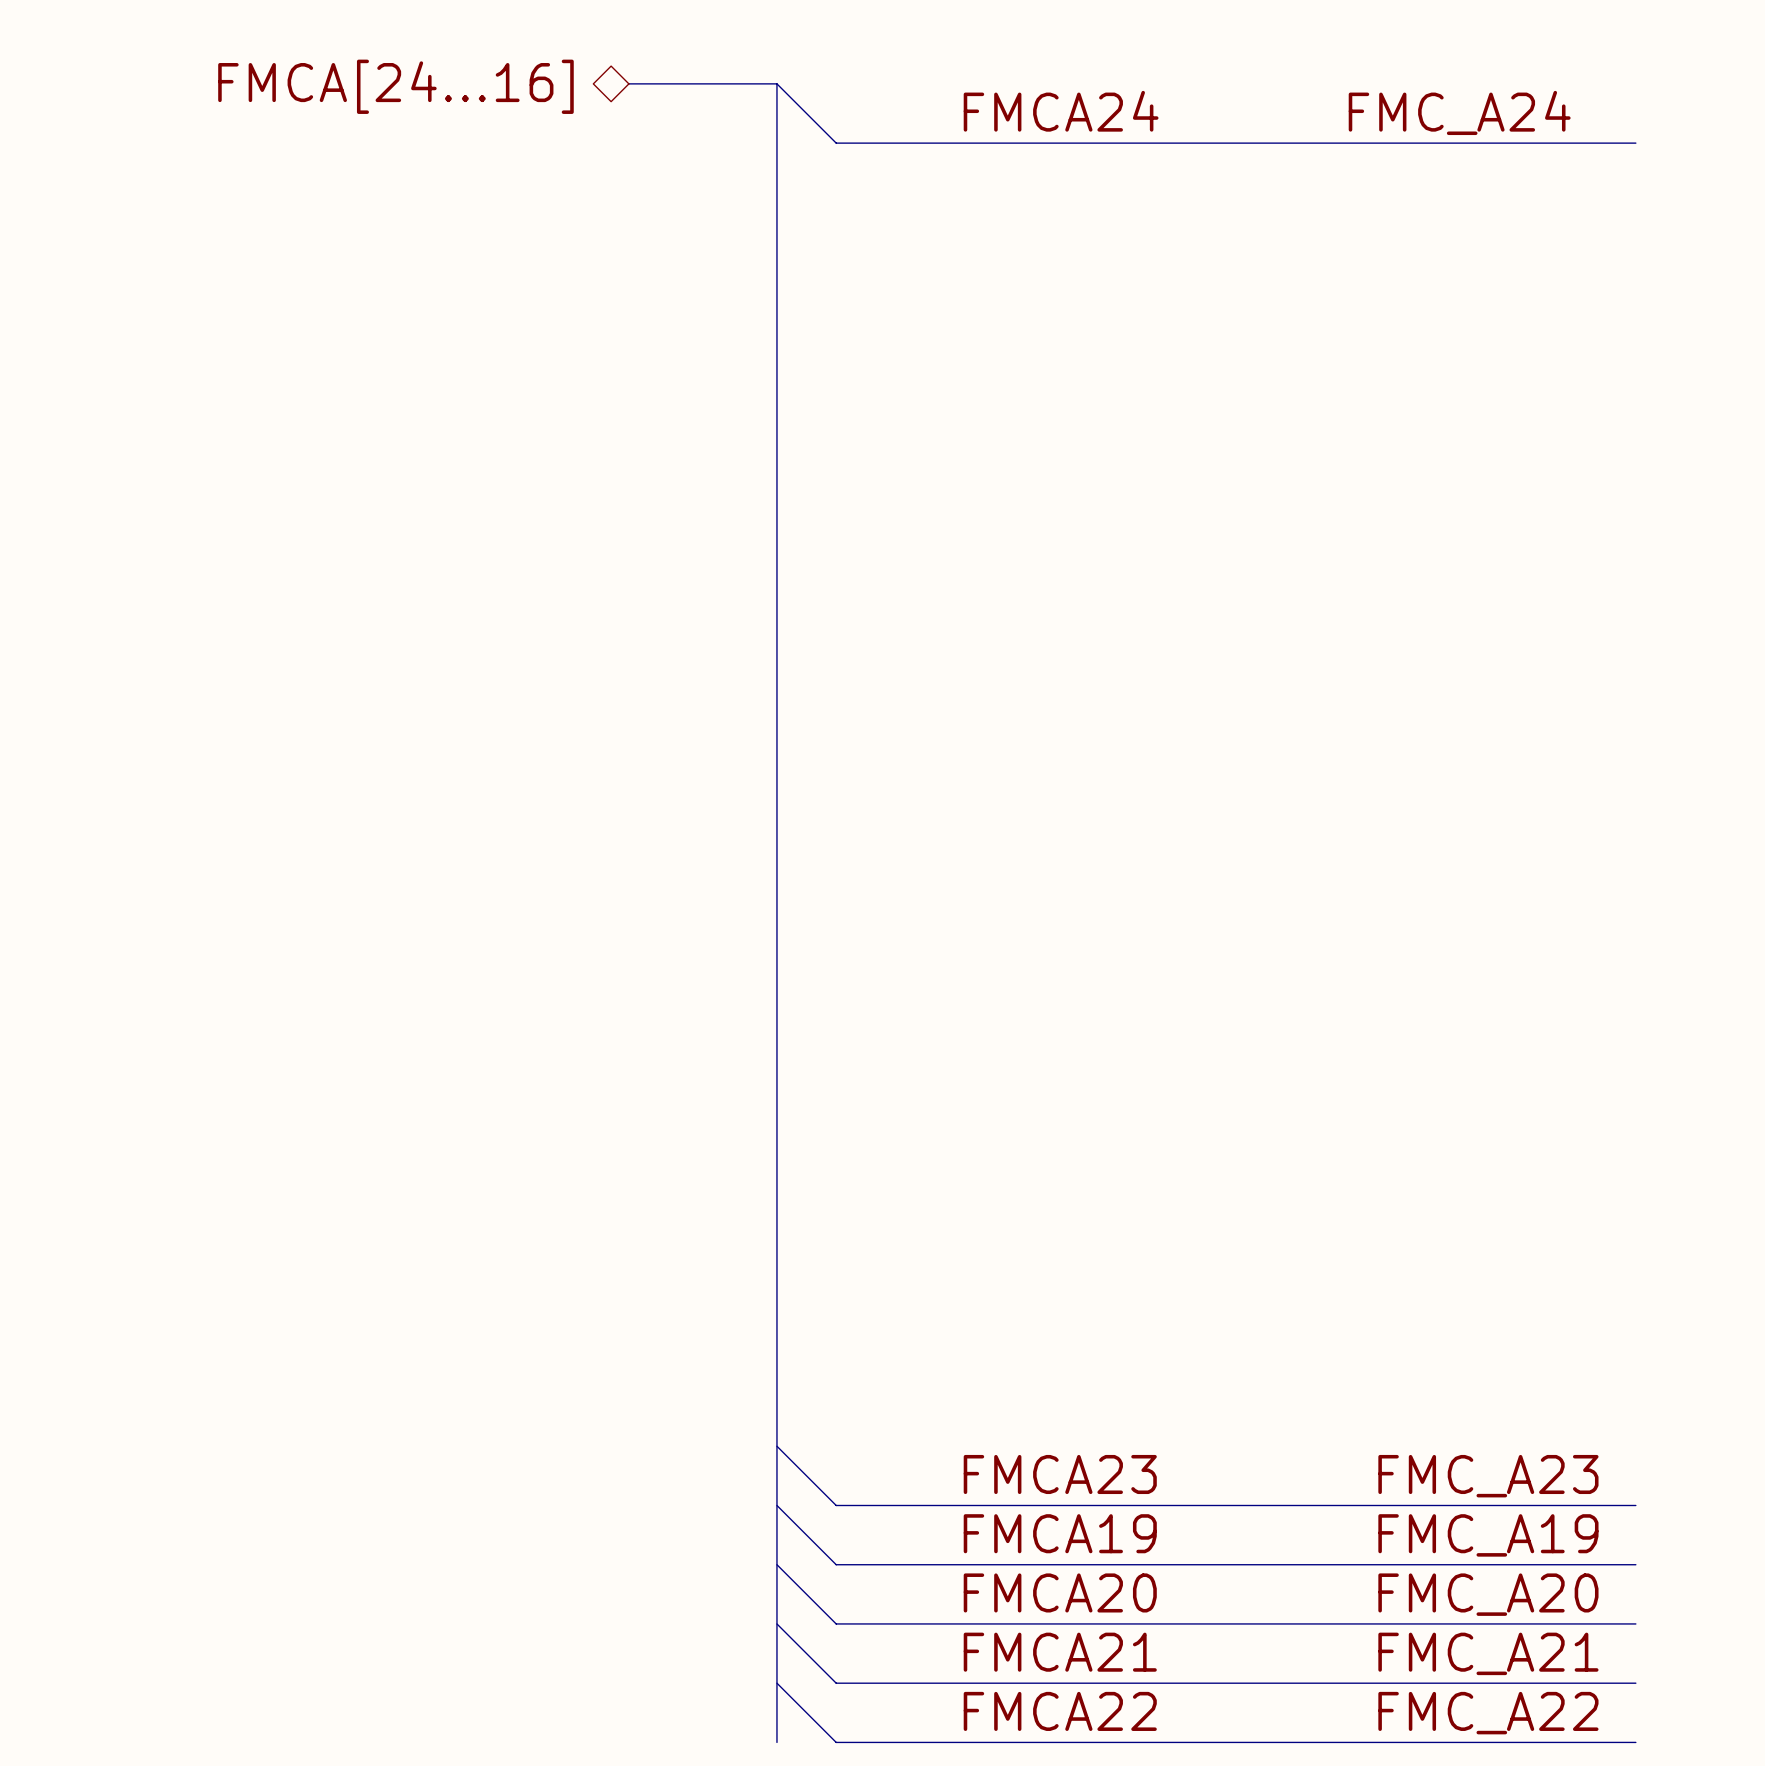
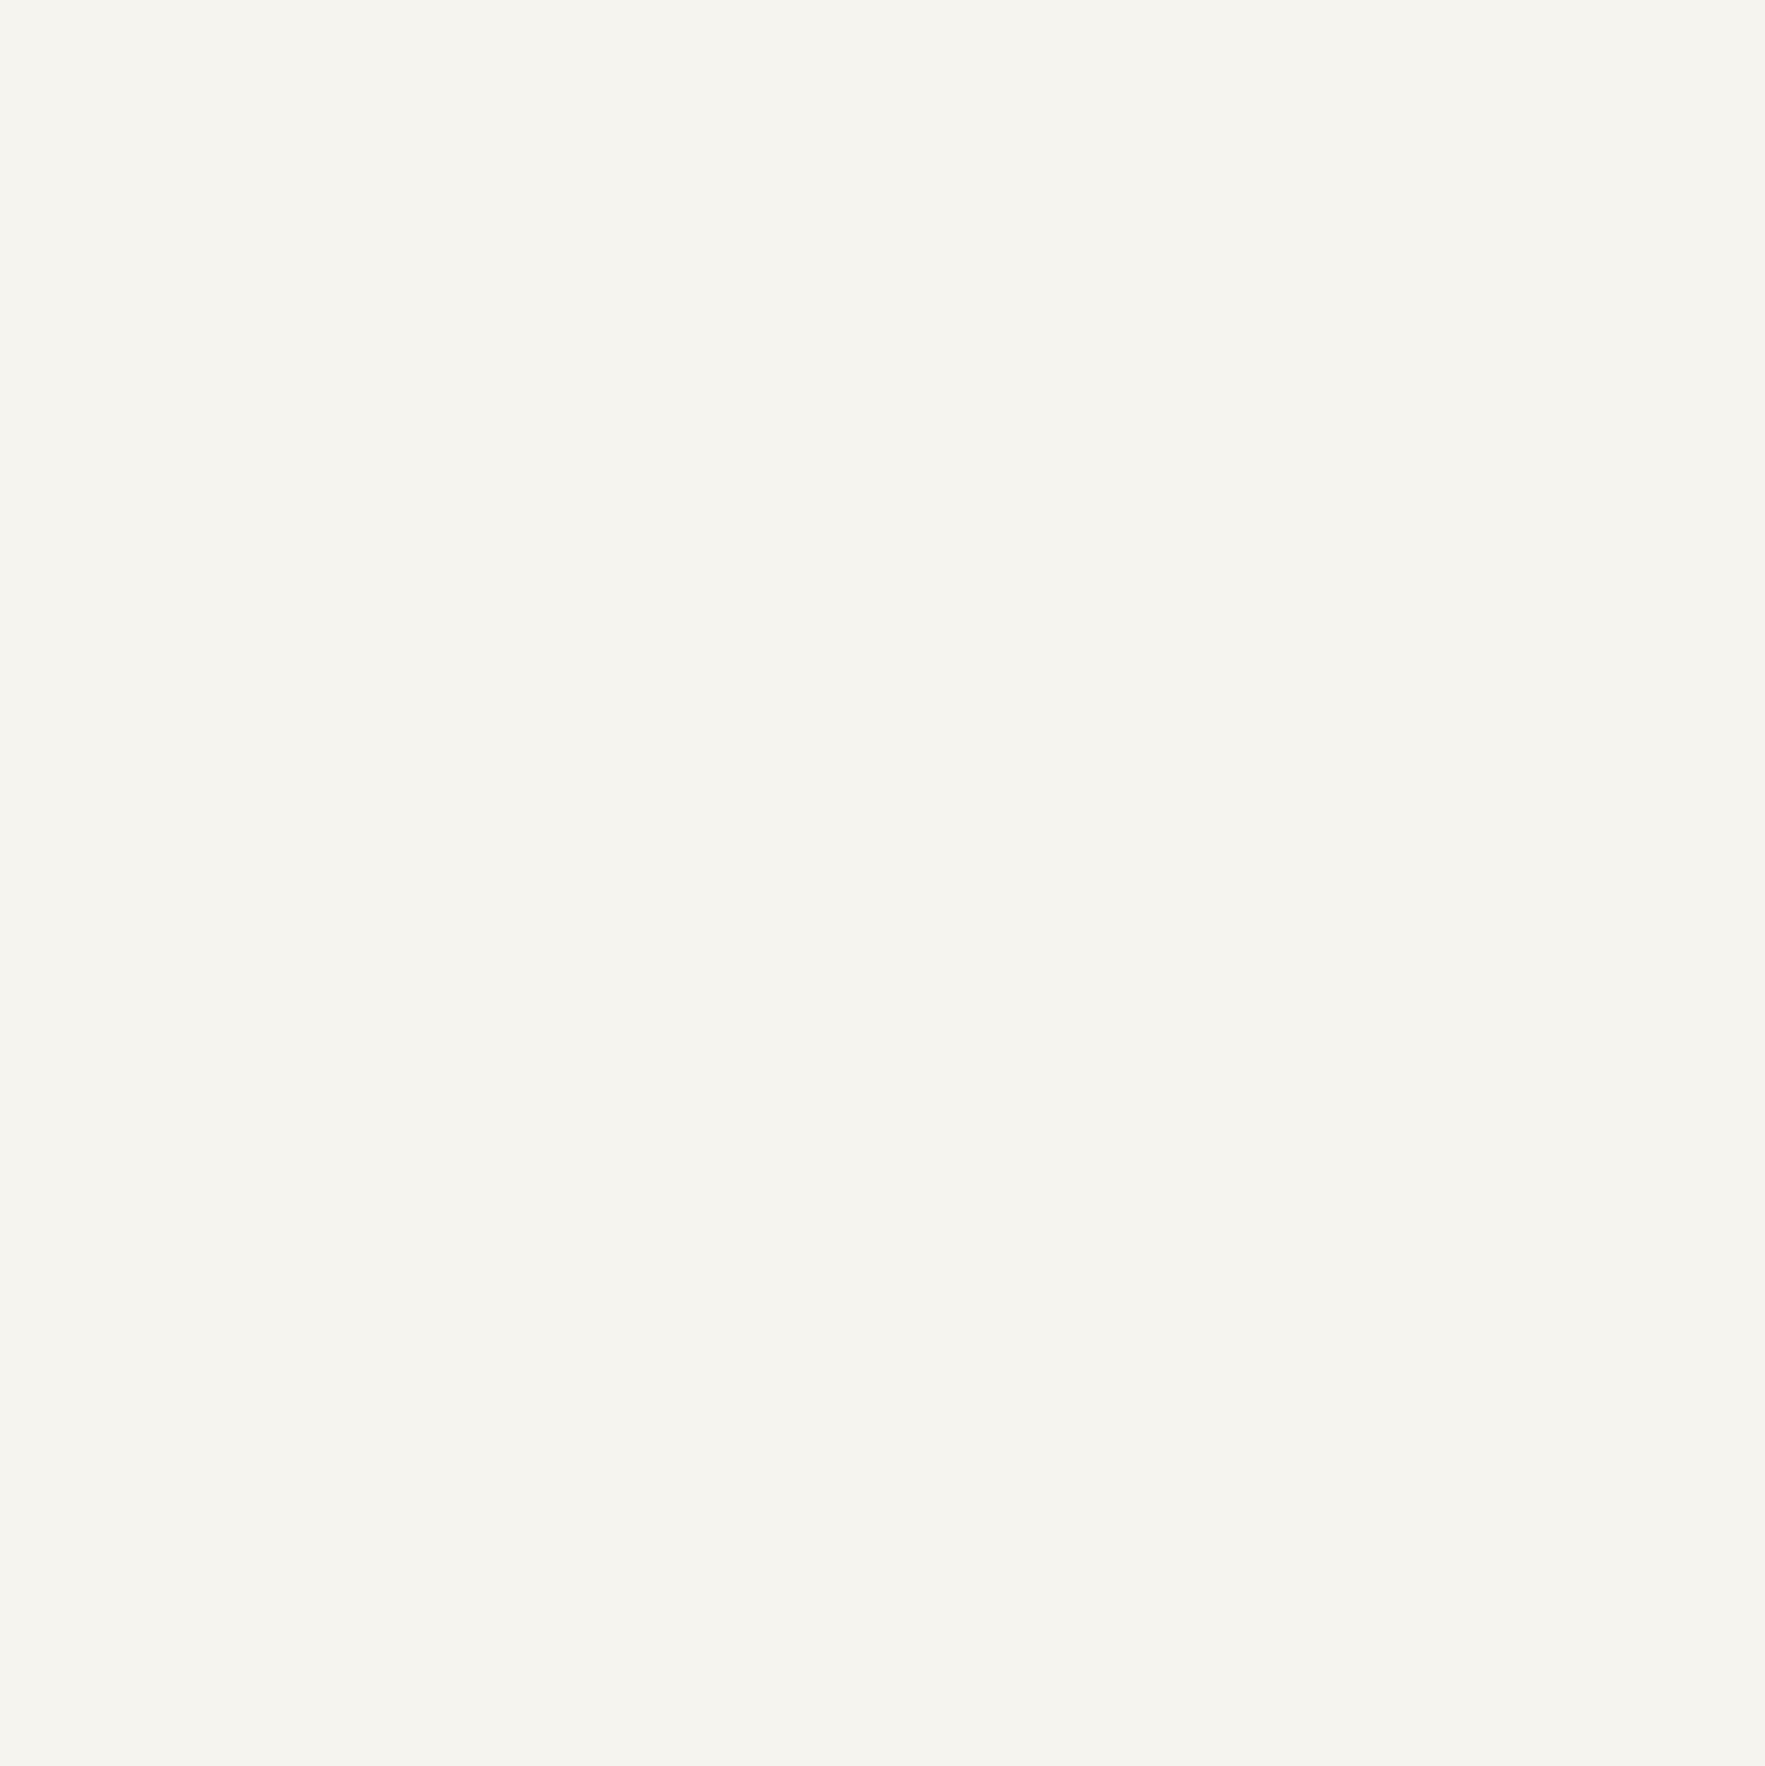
bus: (628, 83) (776, 83) (776, 1742) -> none
wire: (776, 83) (836, 143) (1635, 143) -> none
hierarchical label: FMCA[24...16] (395, 86) -> none
label: FMCA24 (1061, 111) -> none
label: FMC_A24 (1459, 112) -> none
wire: (776, 1446) (836, 1505) (1635, 1505) -> none
label: FMCA23 (1060, 1474) -> none
label: FMC_A23 (1488, 1476) -> none
wire: (776, 1505) (836, 1564) (1635, 1564) -> none
label: FMCA19 (1060, 1533) -> none
label: FMC_A19 (1488, 1535) -> none
wire: (776, 1564) (836, 1623) (1635, 1623) -> none
label: FMCA20 (1060, 1592) -> none
label: FMC_A20 (1488, 1594) -> none
wire: (776, 1623) (836, 1683) (1635, 1683) -> none
label: FMCA21 (1060, 1652) -> none
label: FMC_A21 (1488, 1653) -> none
wire: (776, 1683) (836, 1742) (1635, 1742) -> none
label: FMCA22 (1060, 1711) -> none
label: FMC_A22 (1488, 1713) -> none

